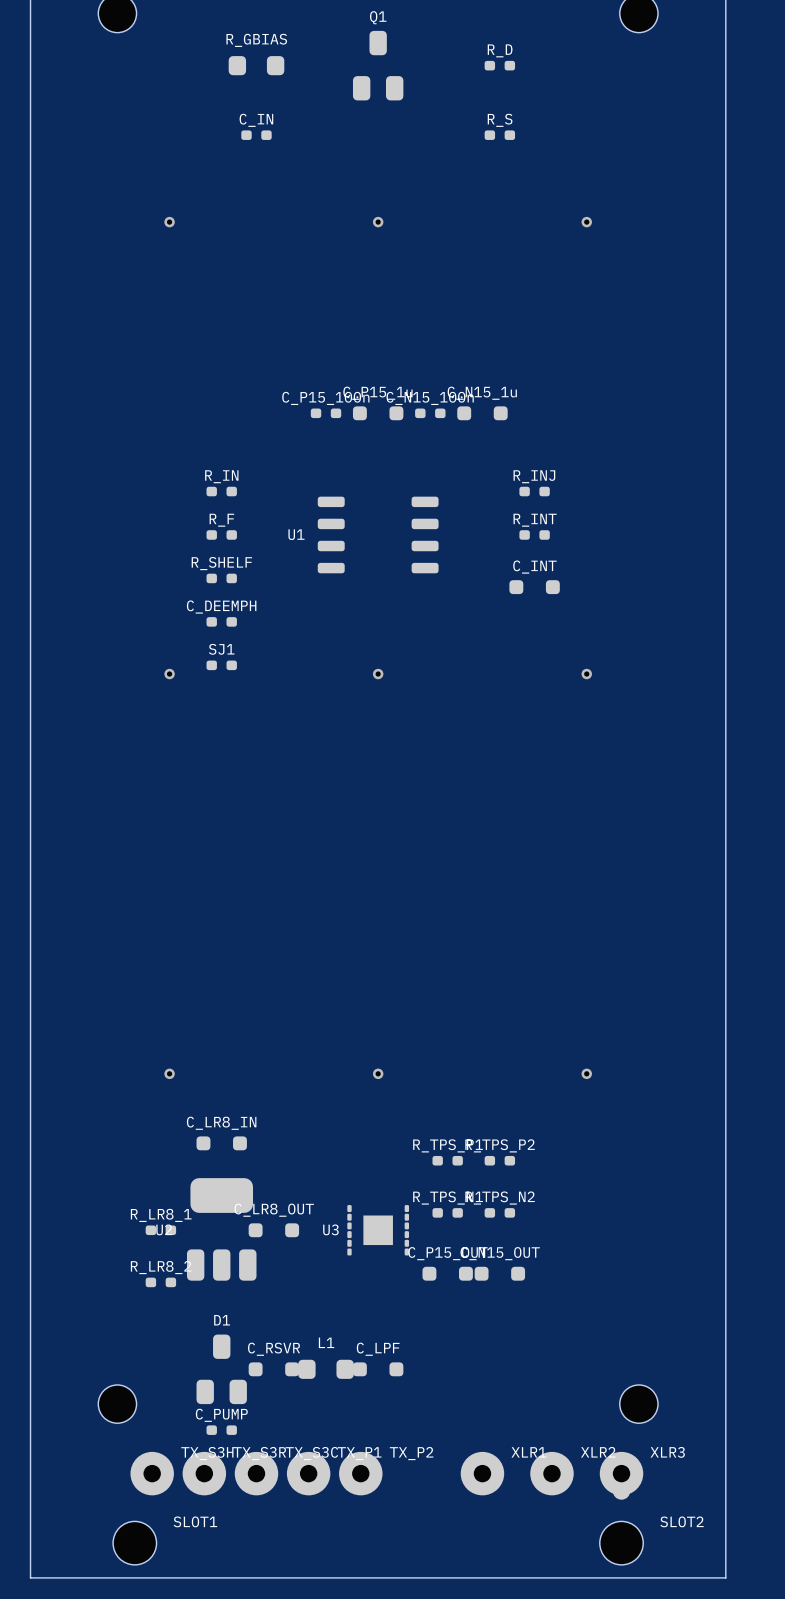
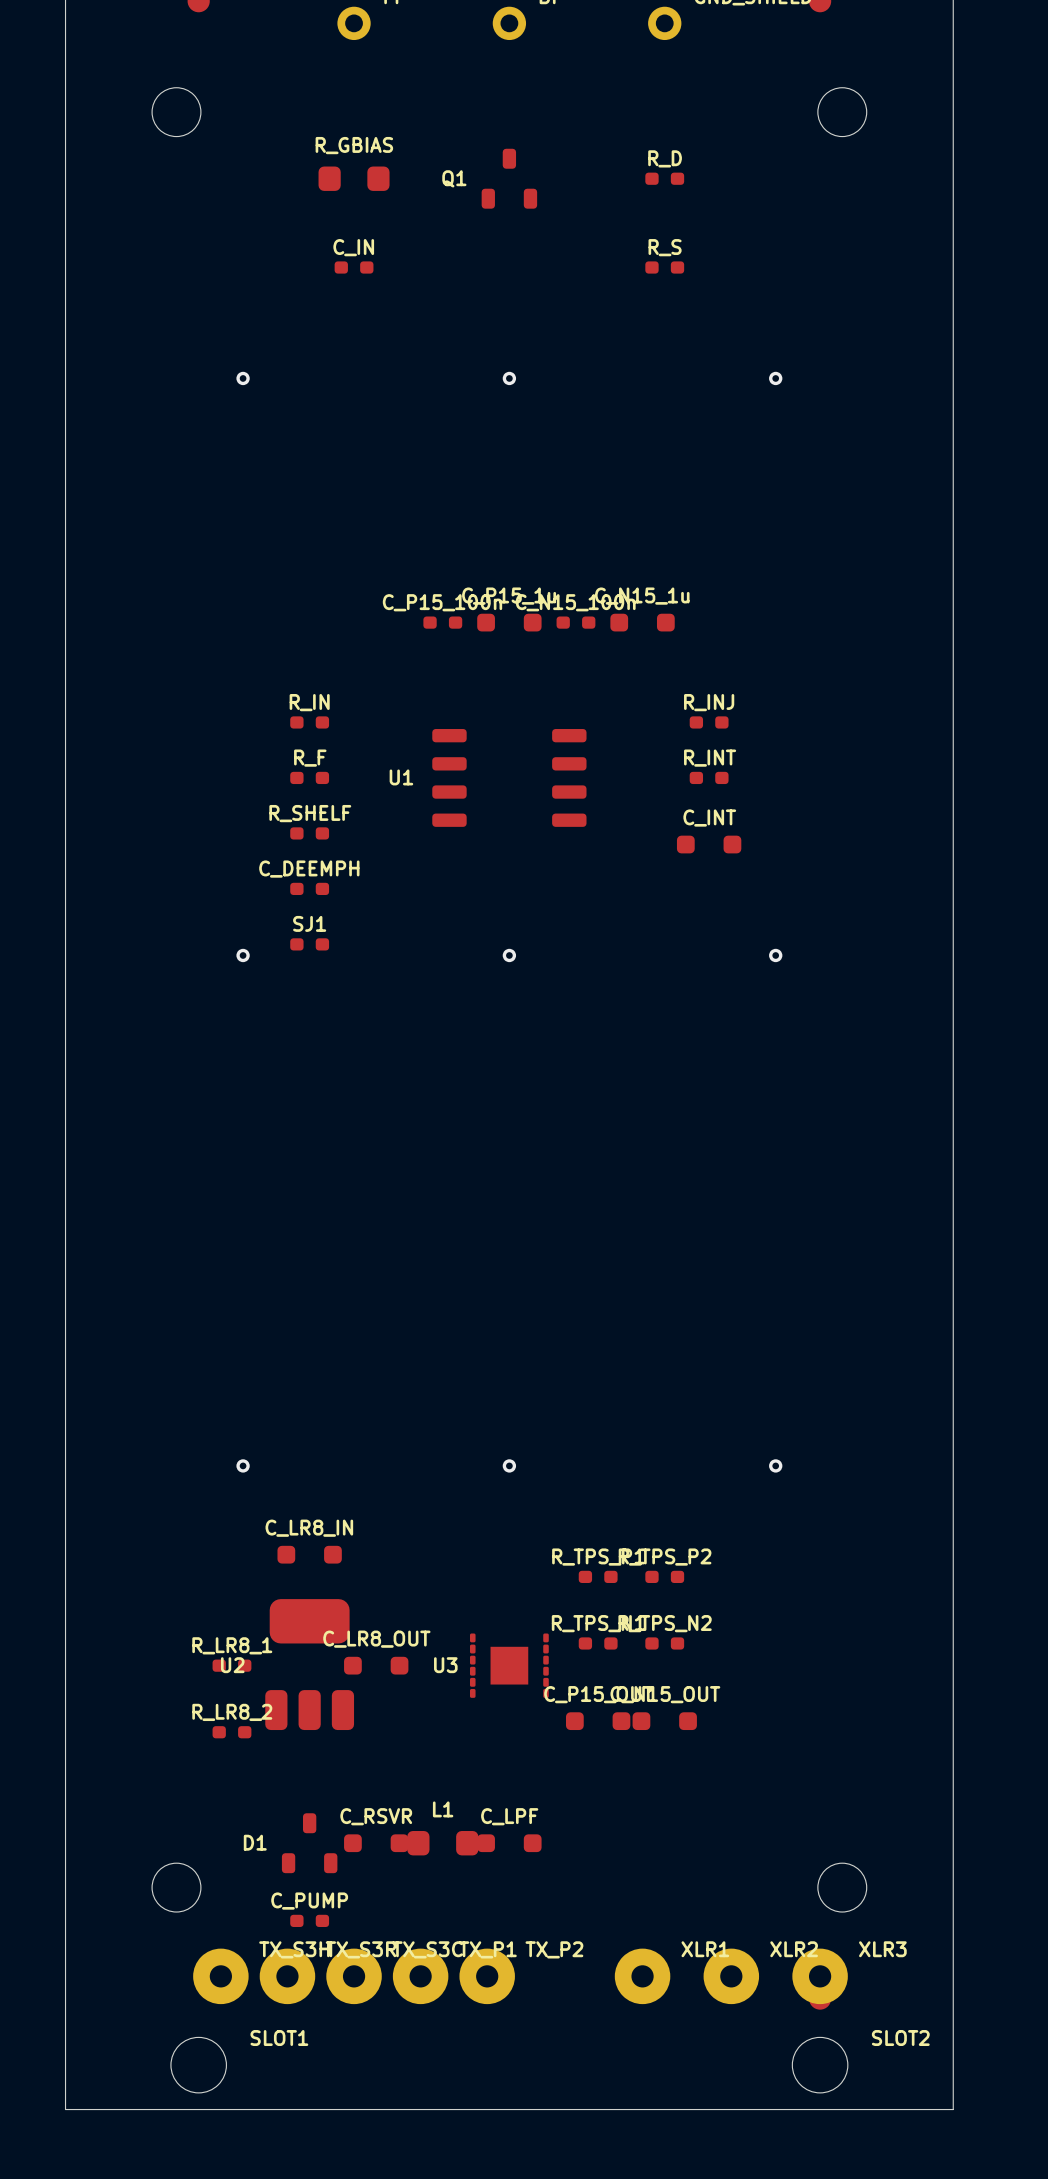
Q1 name position: Q1 (378, 17) -> Q1 (454, 178)
Q1 footprint: [352, 30, 404, 101] -> [481, 148, 538, 209]
D1 name position: D1 (222, 1320) -> D1 (255, 1842)
D1 footprint: [196, 1334, 247, 1405] -> [281, 1813, 338, 1874]

